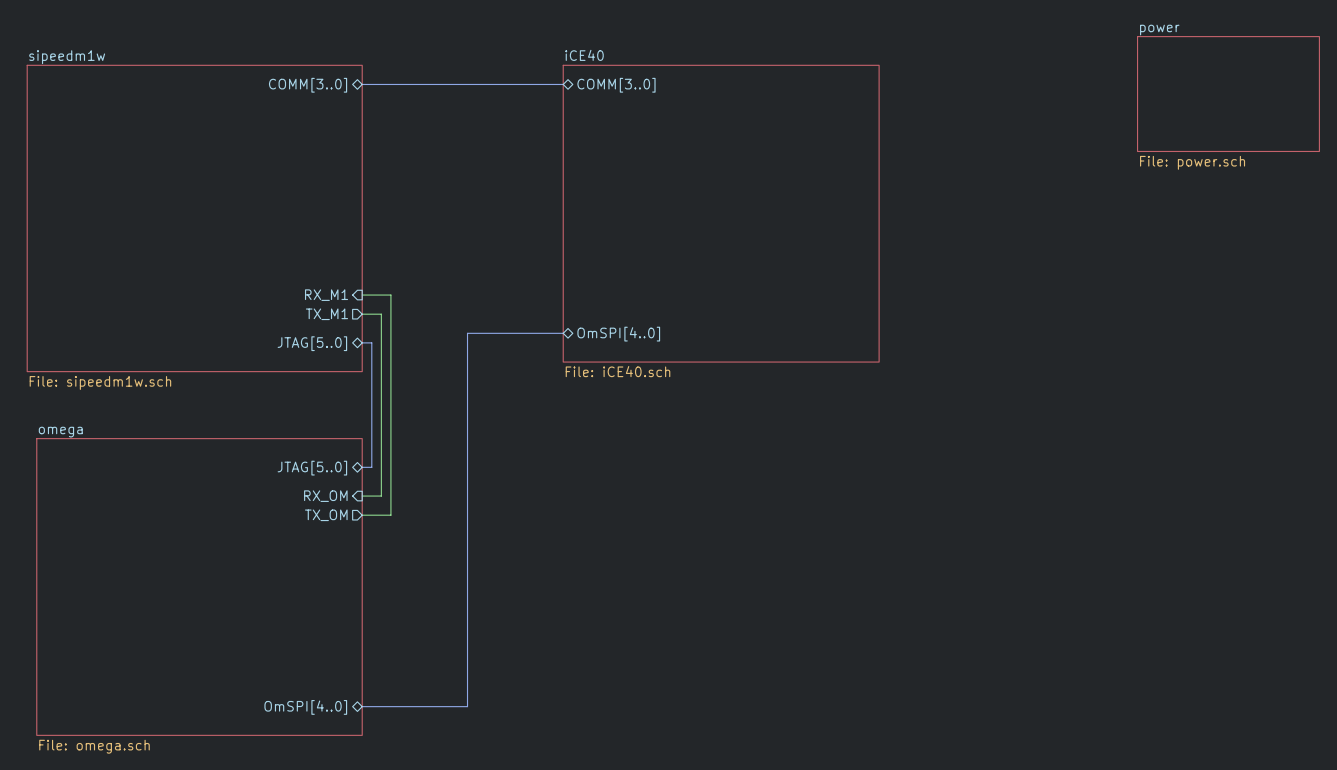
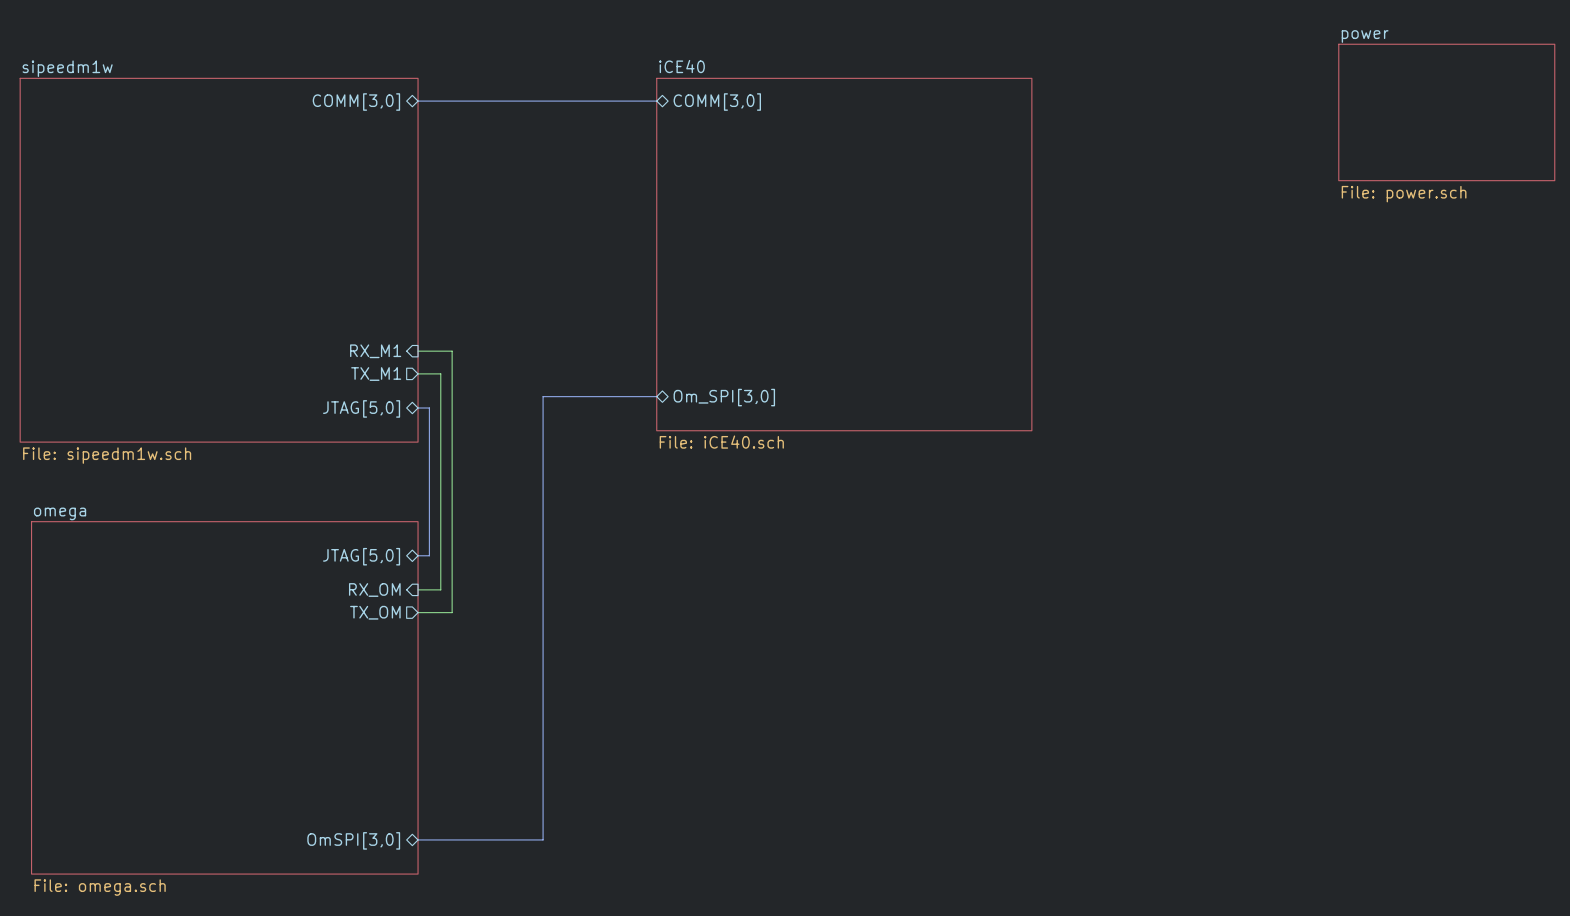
sheet pin: COMM[3..0] (308, 85) -> COMM[3,0] (356, 102)
sheet pin: COMM[3..0] (616, 85) -> COMM[3,0] (717, 102)
sheet pin: OmSPI[4..0] (618, 334) -> Om_SPI[3,0] (724, 397)
sheet pin: JTAG[5..0] (312, 343) -> JTAG[5,0] (361, 408)
sheet pin: JTAG[5..0] (312, 468) -> JTAG[5,0] (361, 556)
sheet pin: OmSPI[4..0] (305, 707) -> OmSPI[3,0] (353, 840)

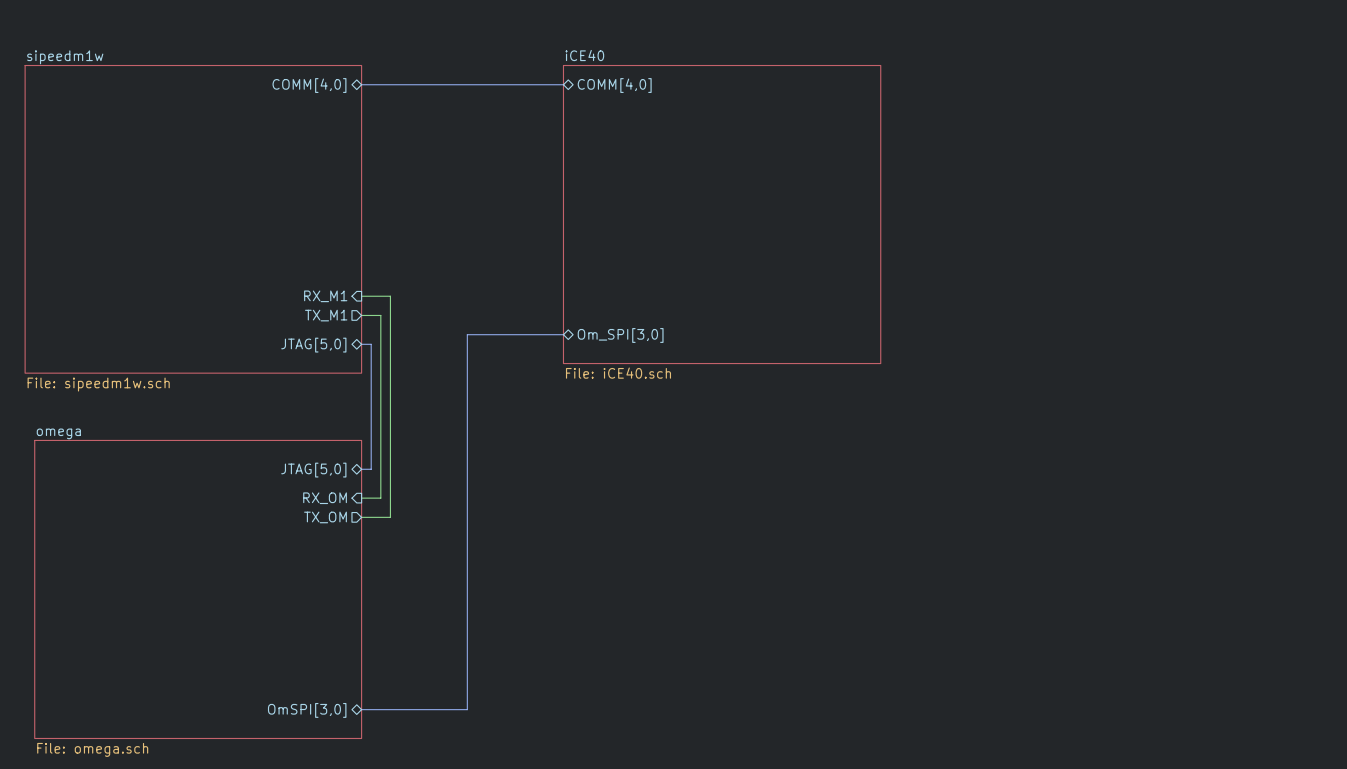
sheet pin: COMM[3,0] (356, 102) -> COMM[4,0] (309, 85)
sheet pin: COMM[3,0] (717, 102) -> COMM[4,0] (614, 85)
sheet power: File: power.sch (1446, 112) -> none

